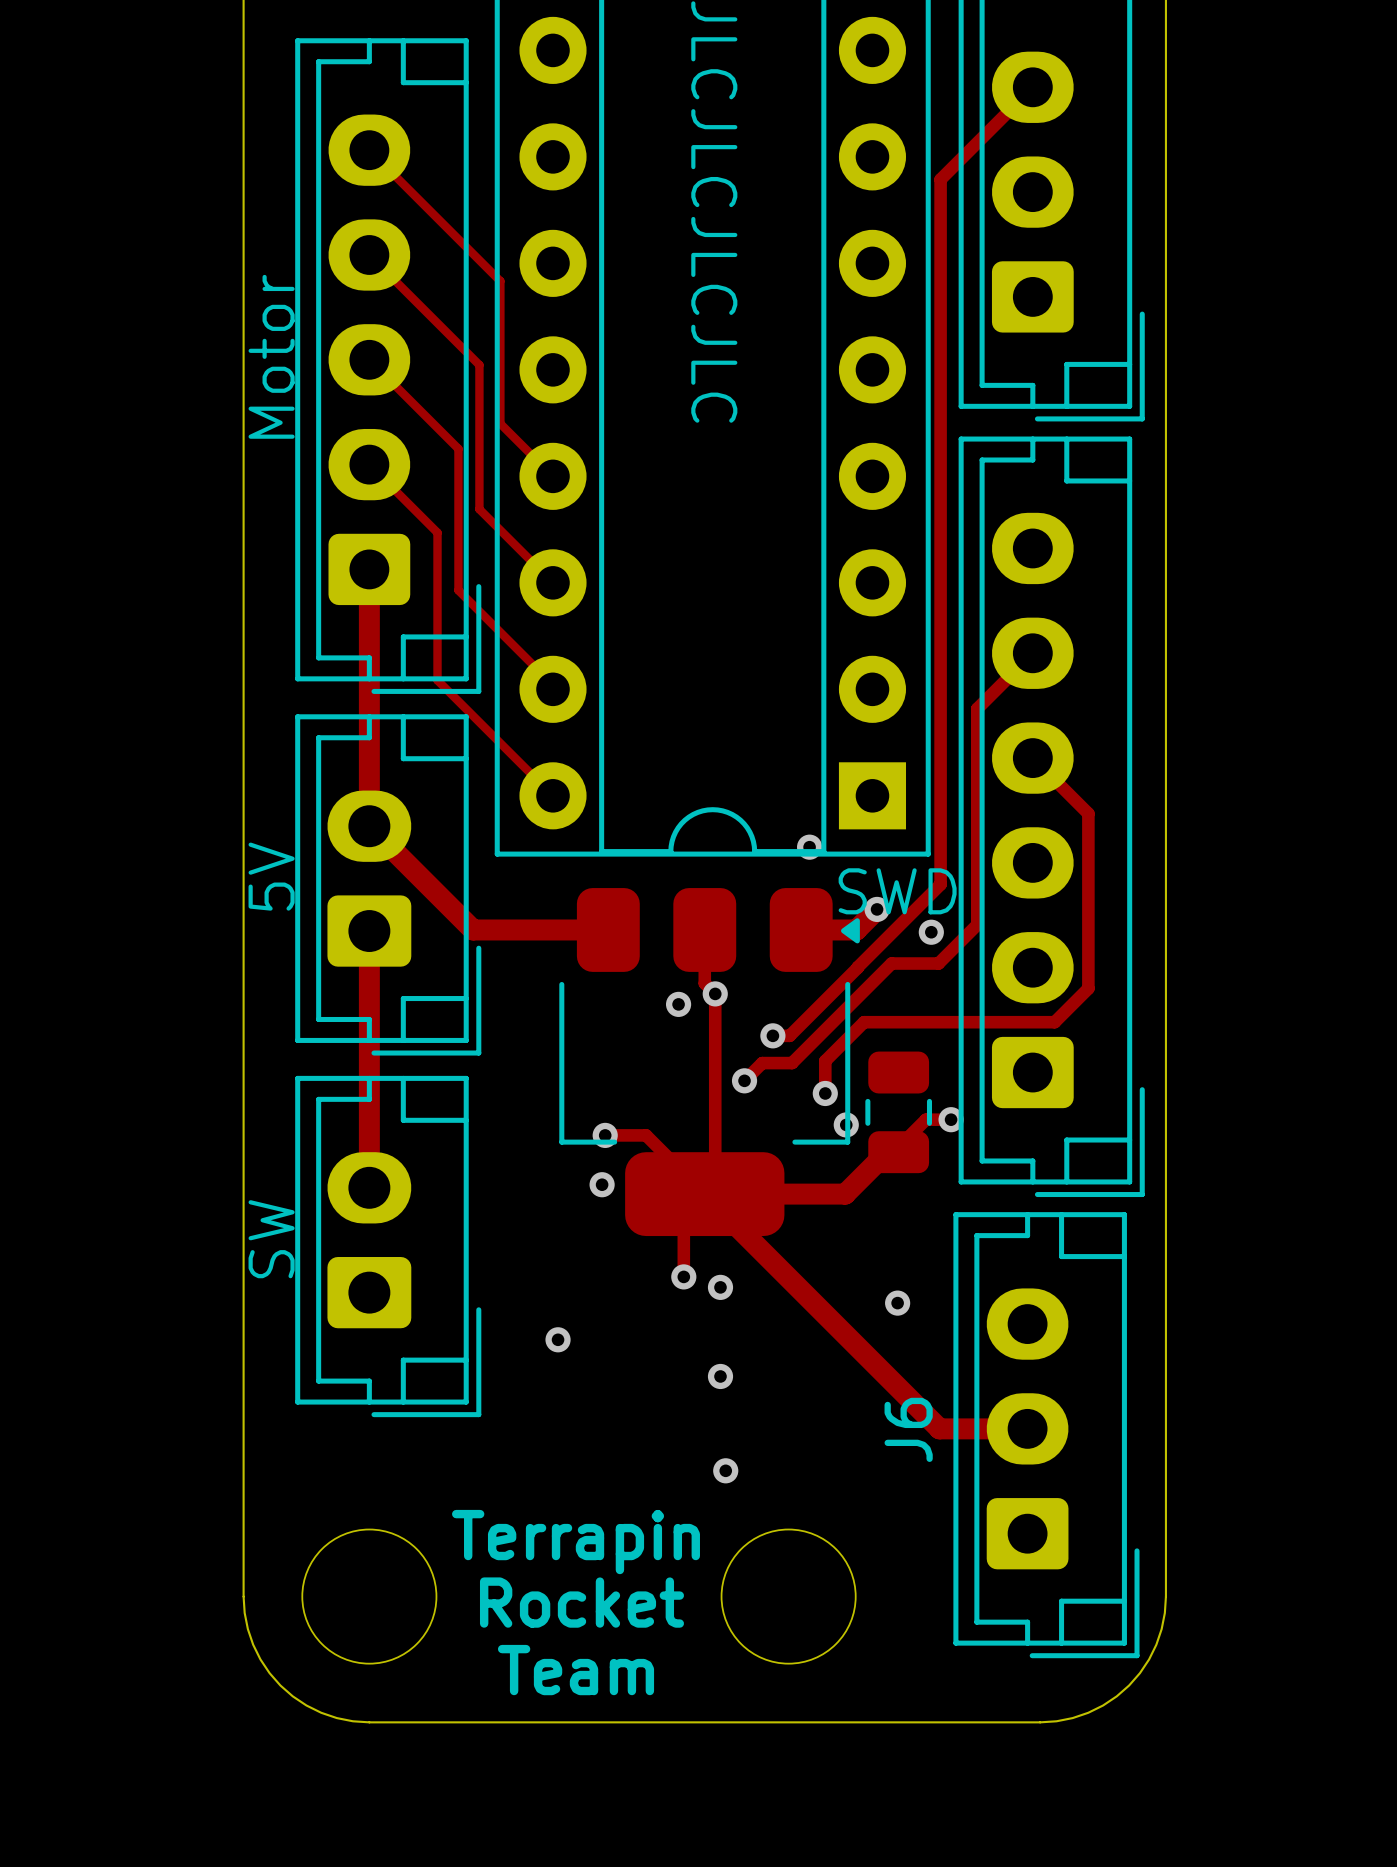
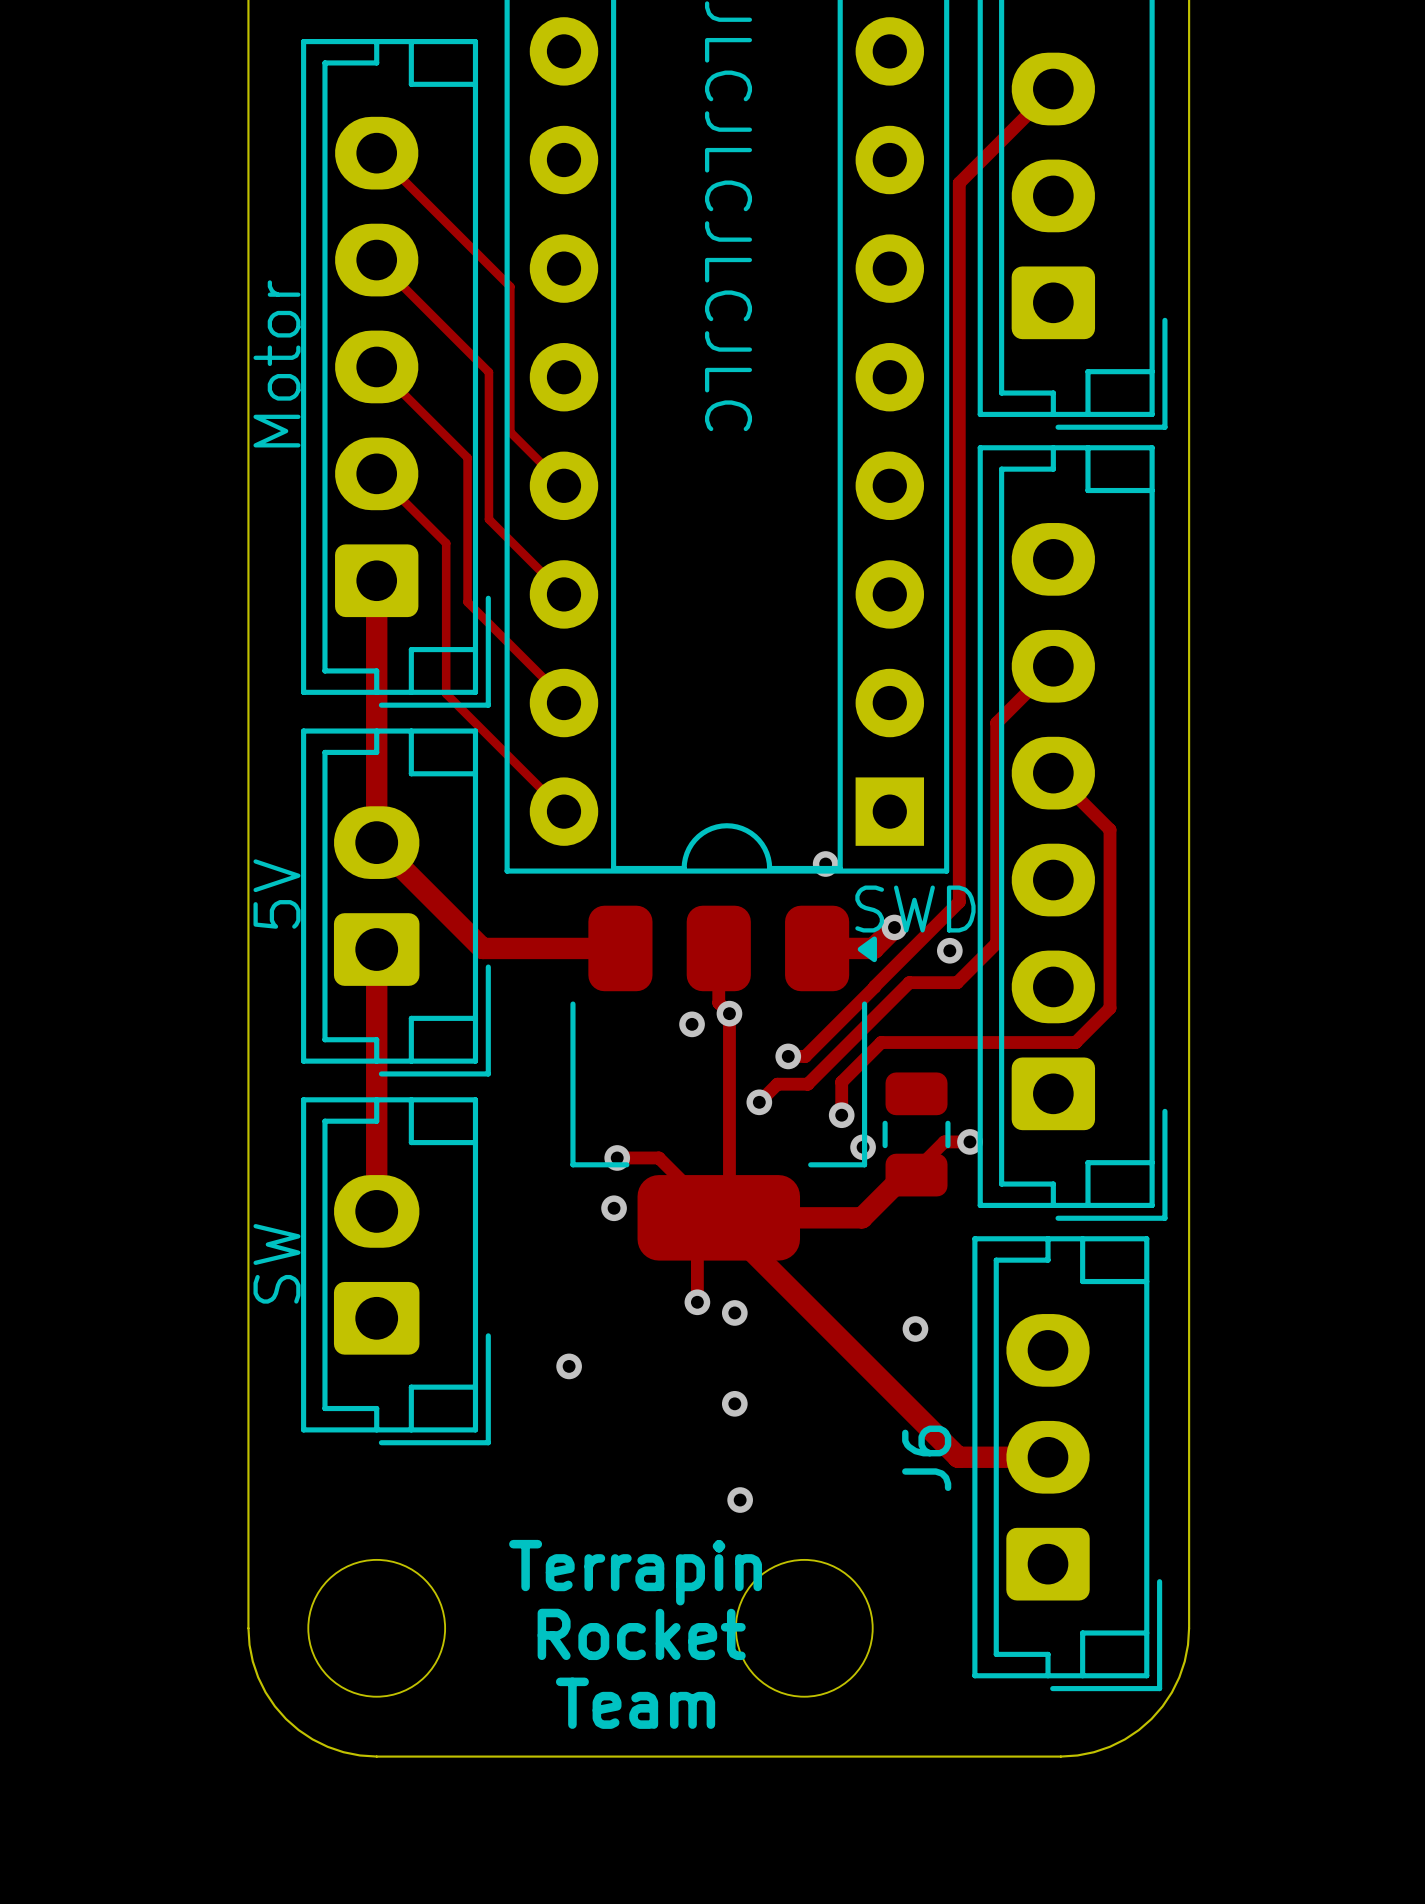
text position: Terrapin (576, 1542) -> Terrapin (635, 1572)
text position: Rocket (581, 1602) -> Rocket (641, 1634)
text position: Team (576, 1670) -> Team (635, 1703)

